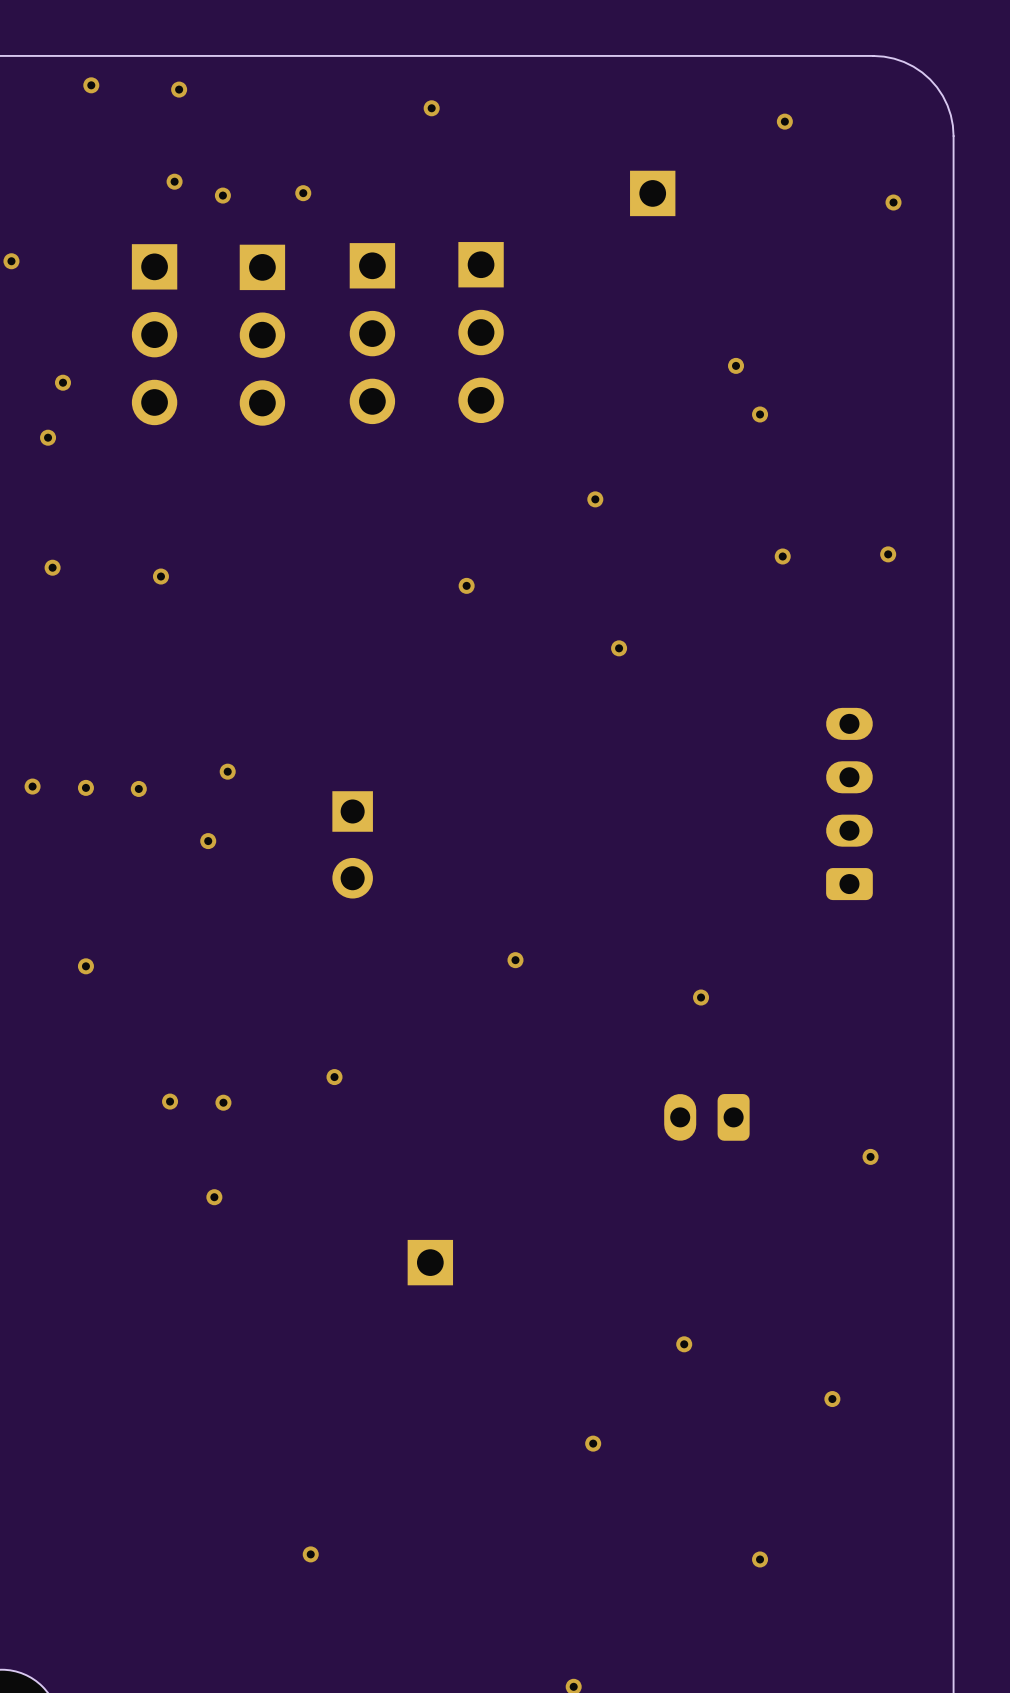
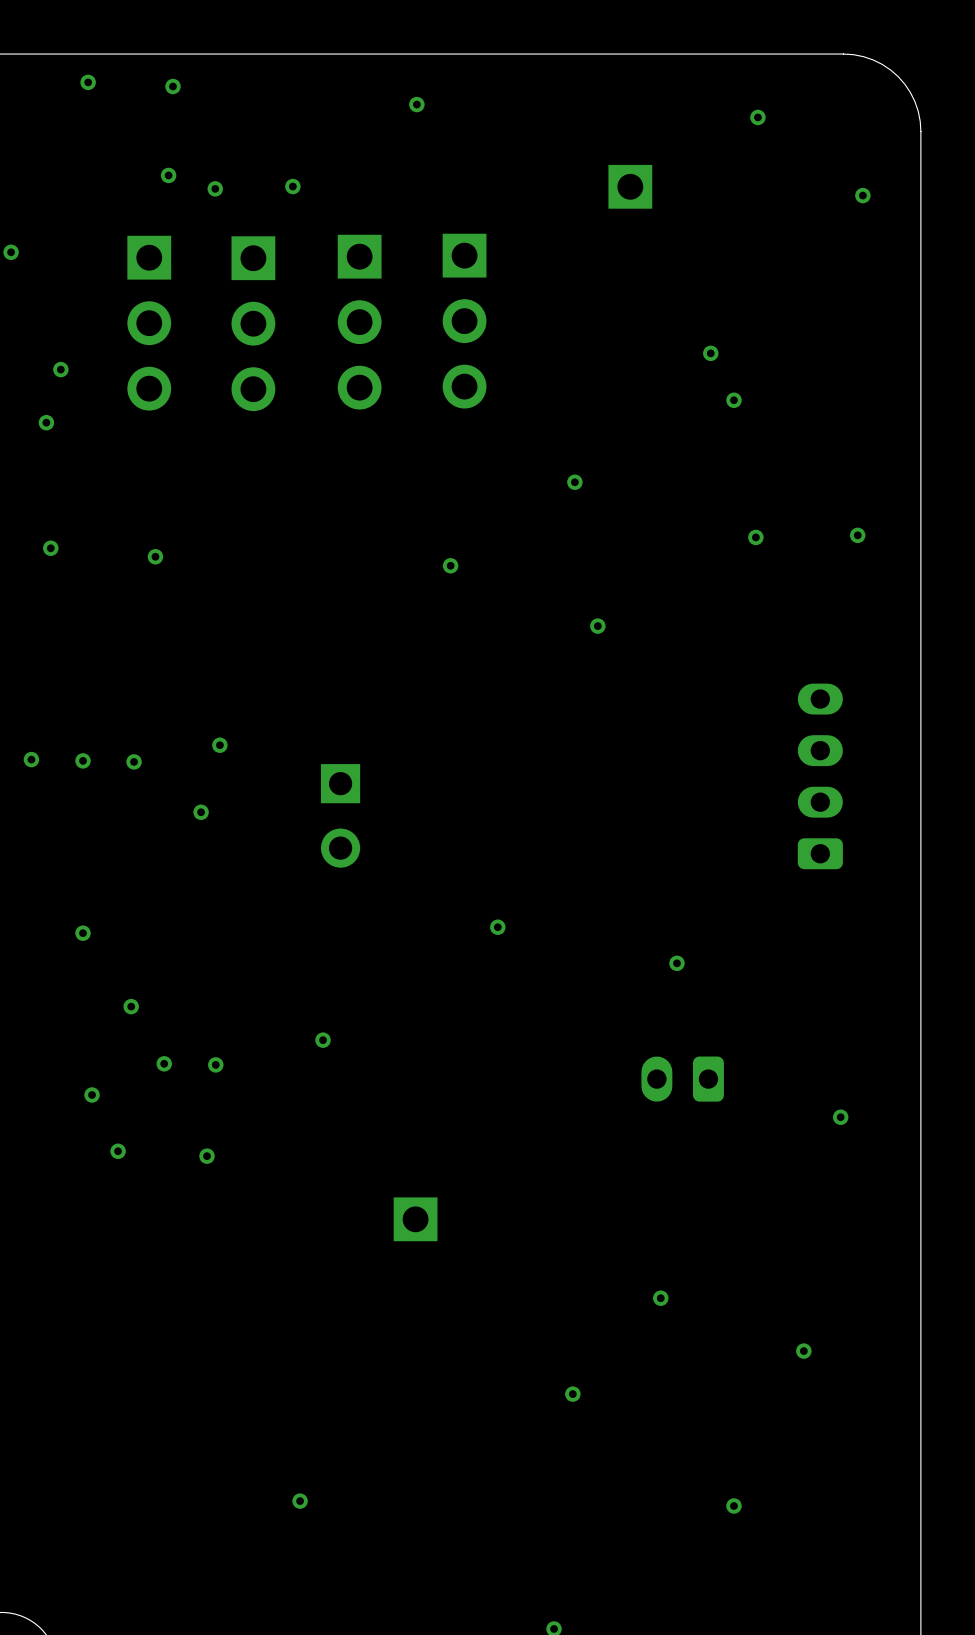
via: none -> (131, 1006)
via: none -> (92, 1095)
via: none -> (118, 1151)

